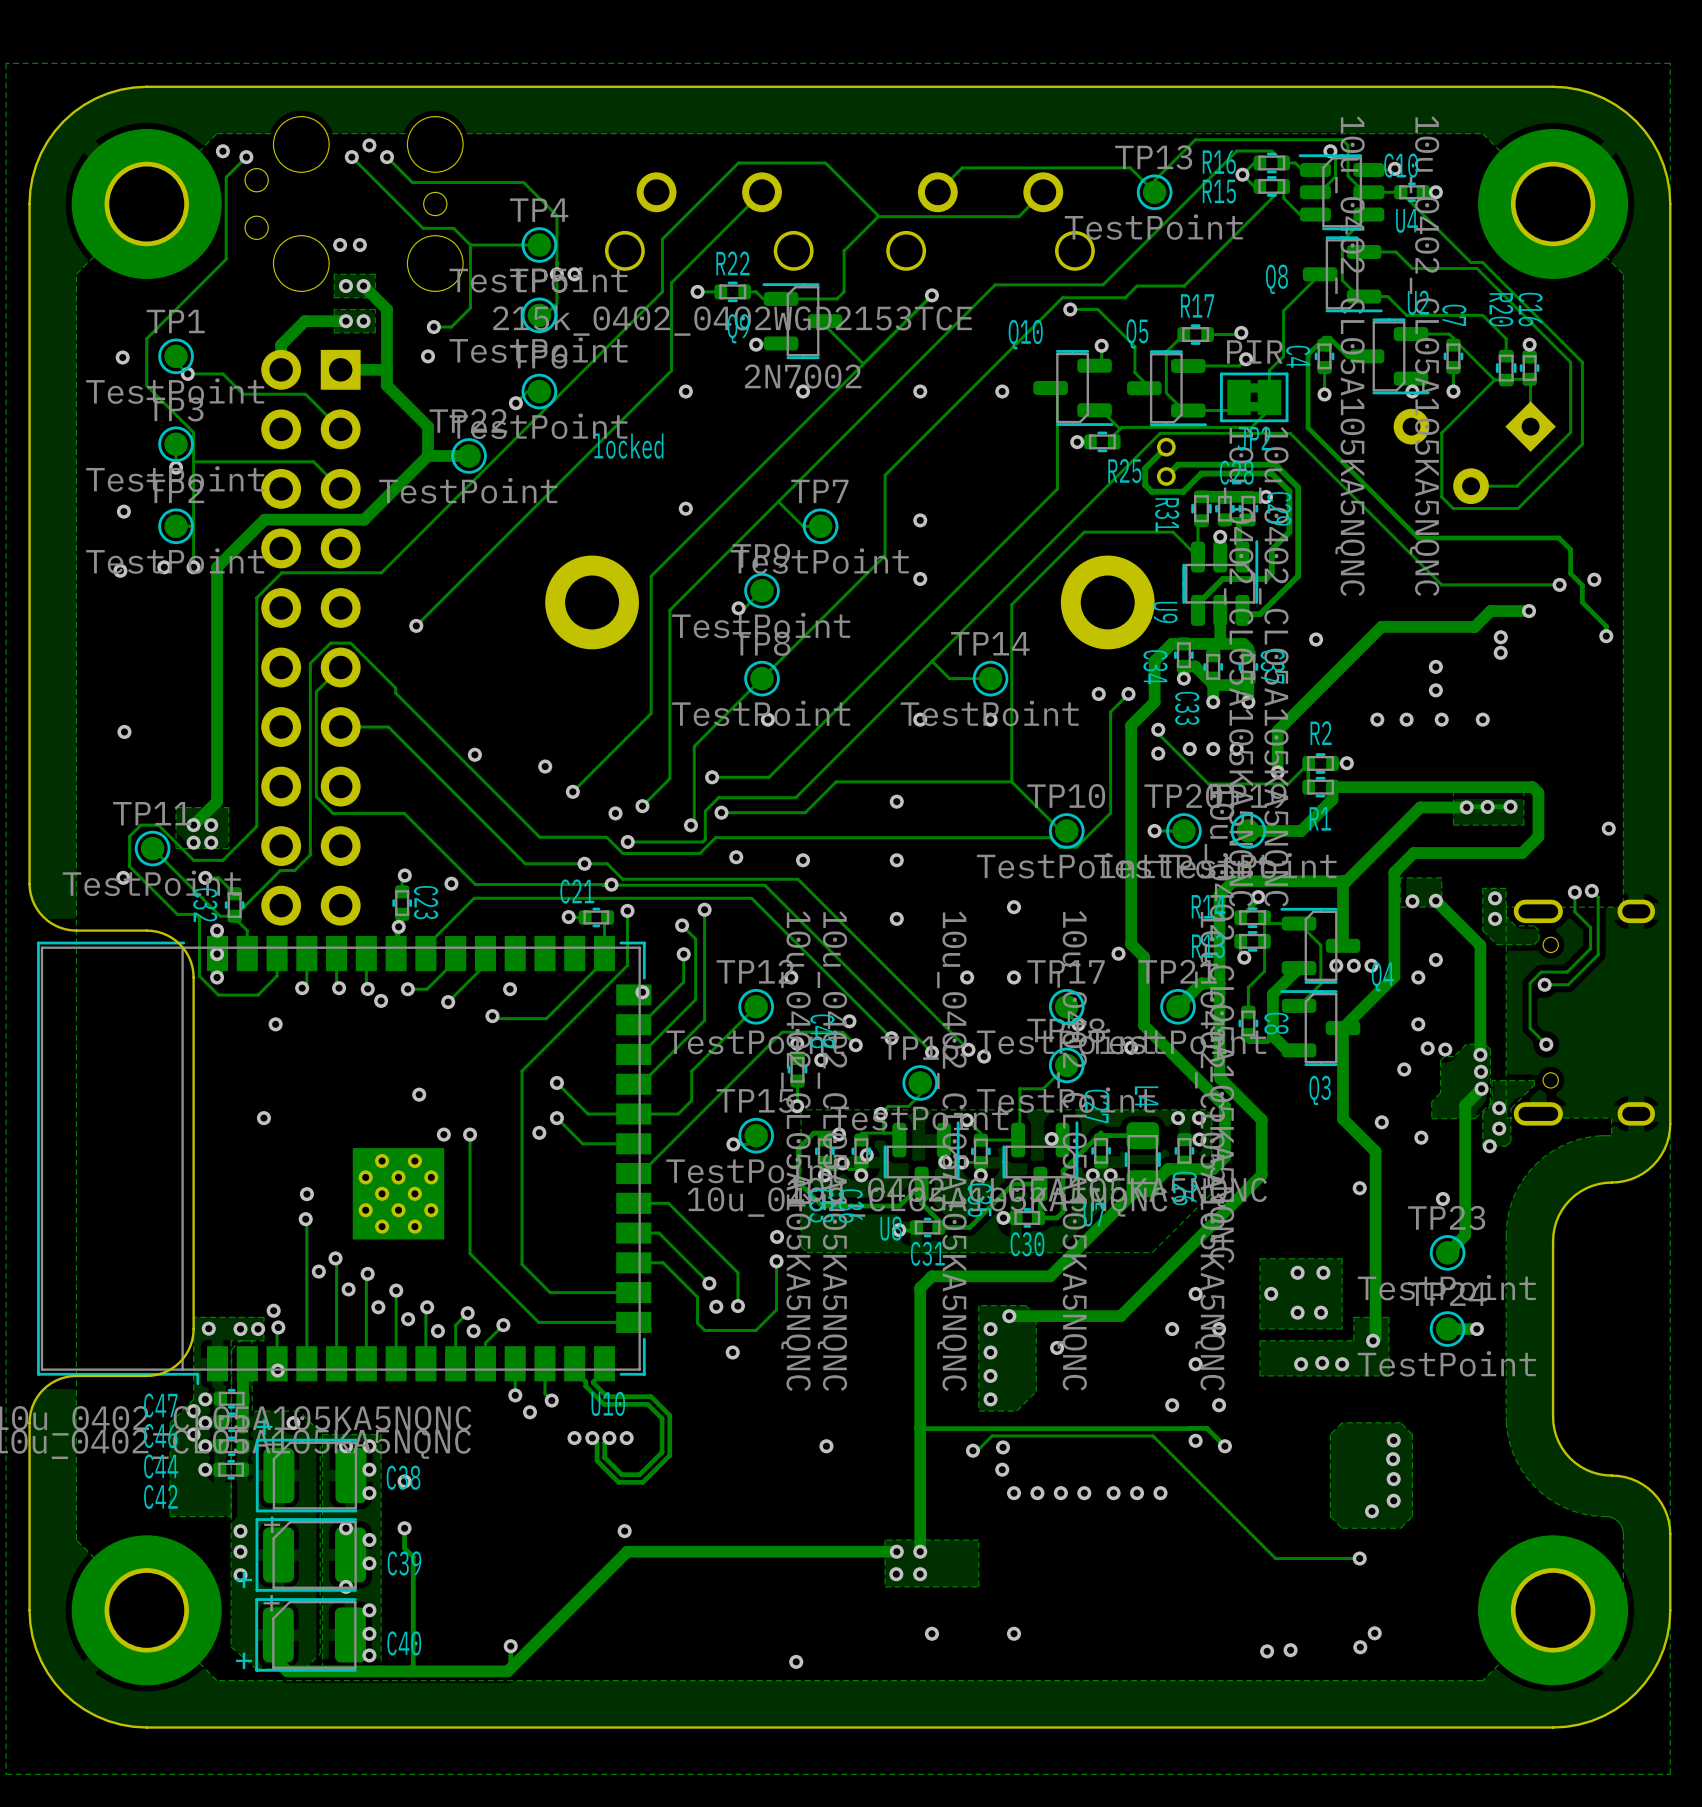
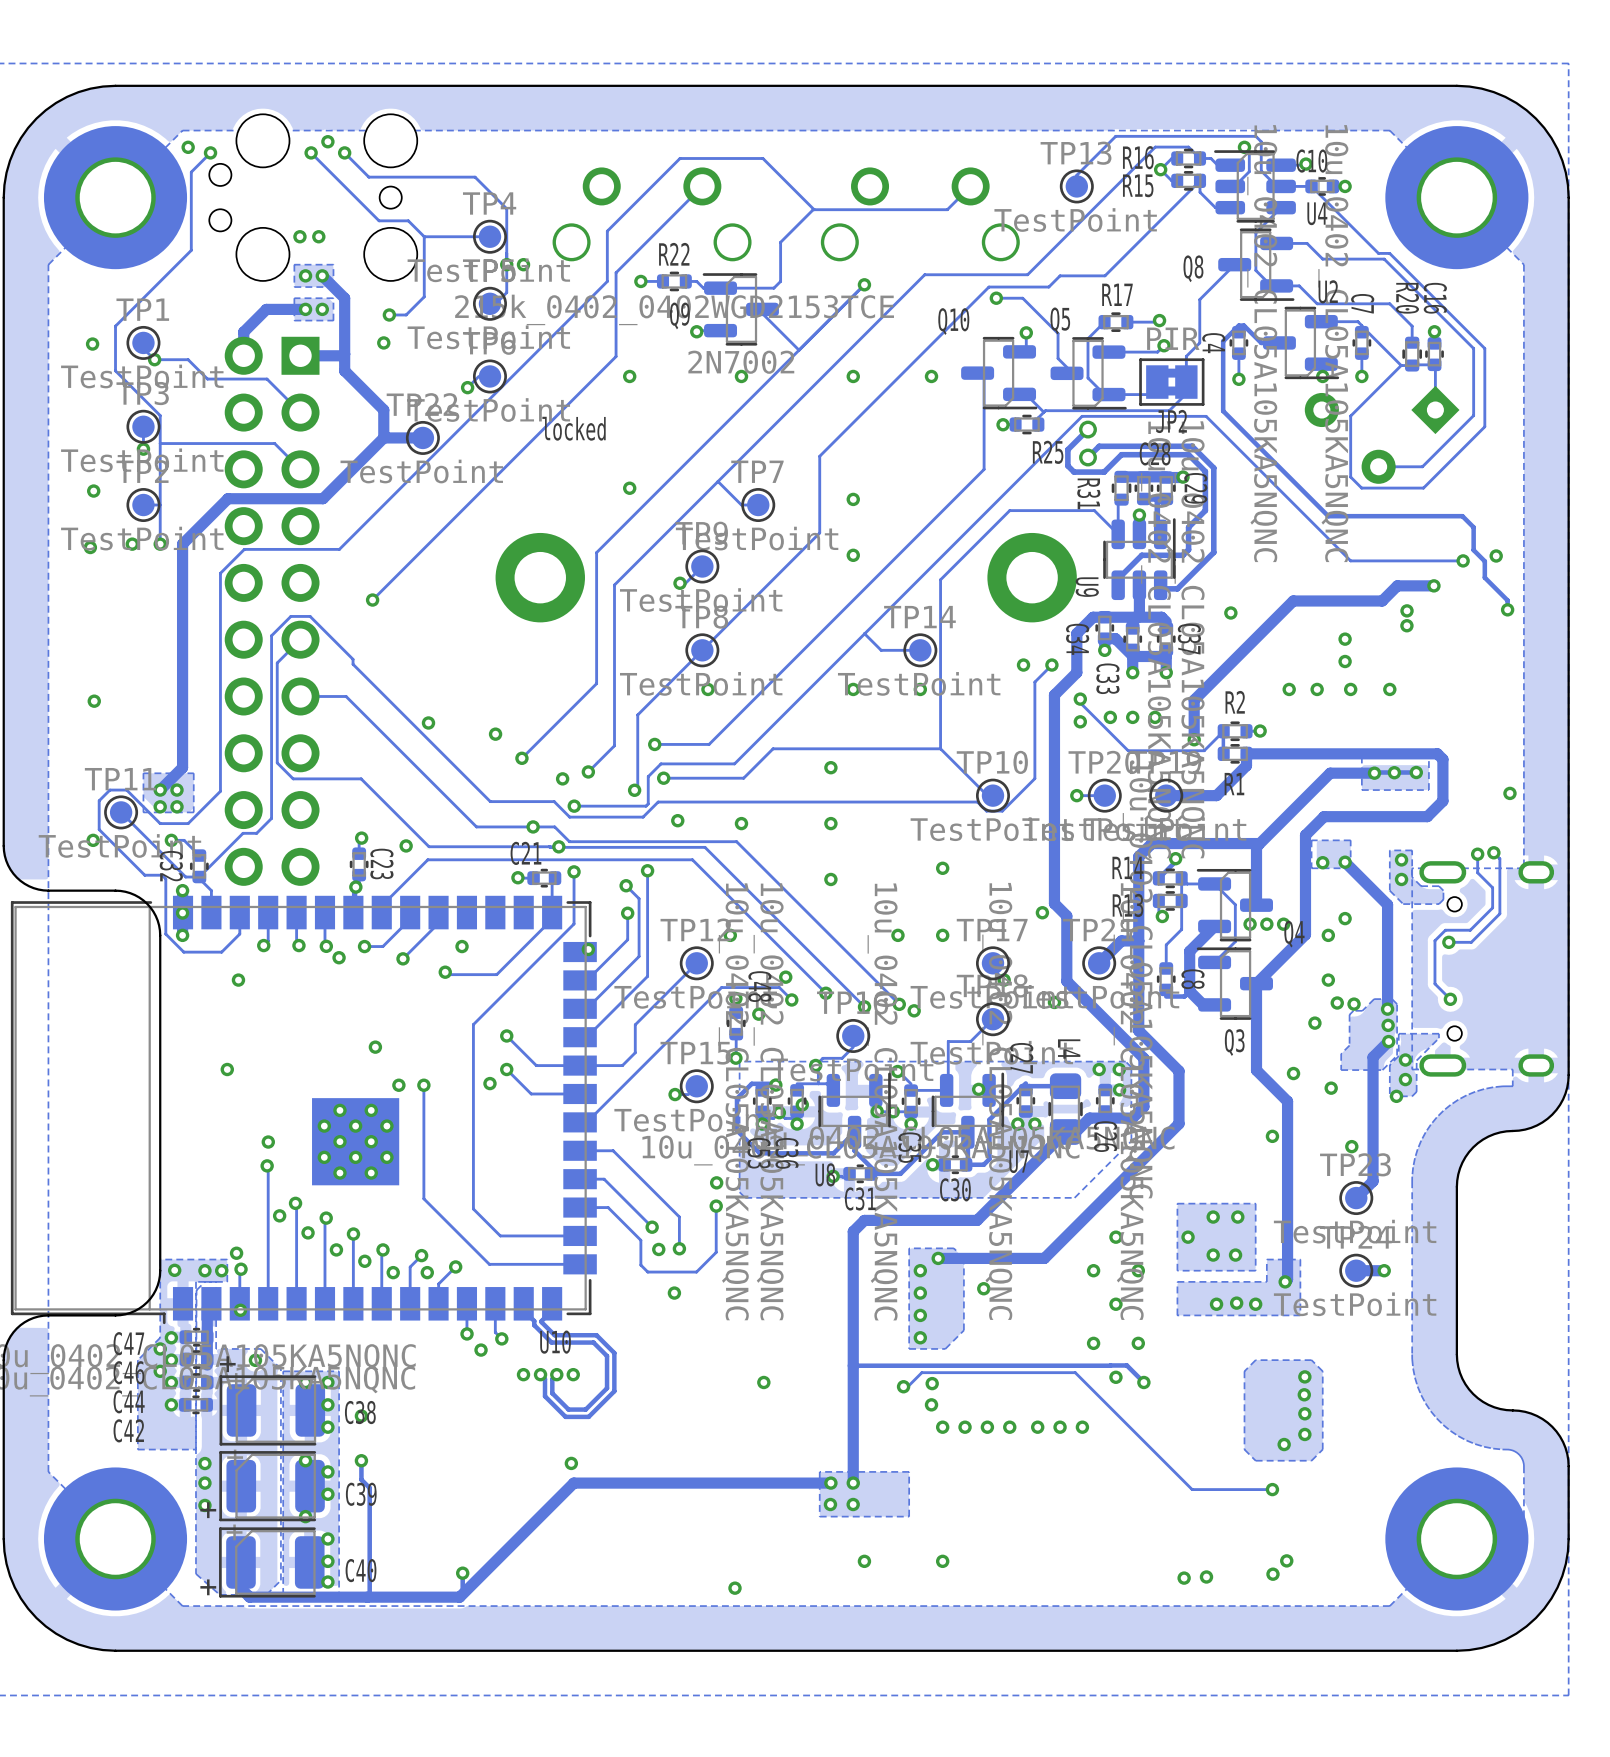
track: (1154, 192) (1130, 167) (962, 167) (937, 192) -> none

